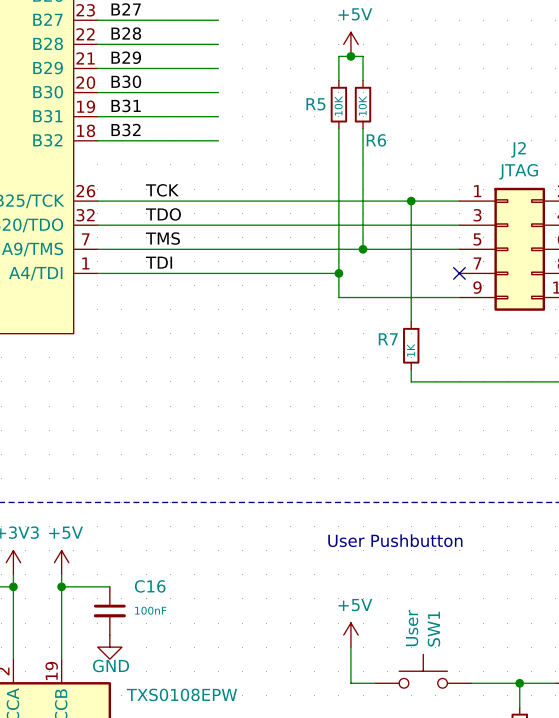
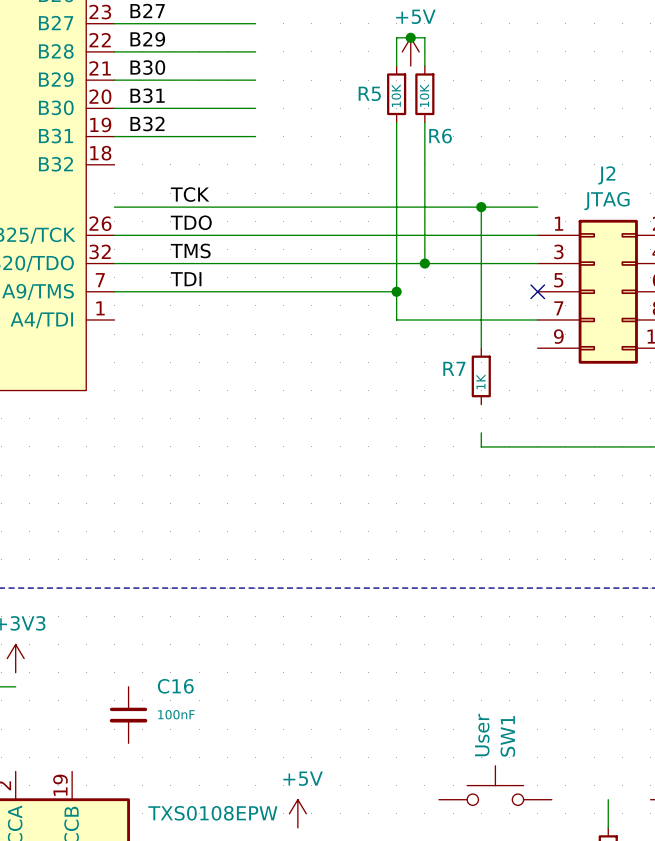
label: B28 (126, 33) -> B29 (147, 39)
junction position: (350, 56) -> (410, 37)
label: B29 (126, 57) -> B30 (147, 67)
wire: (338, 80) (338, 56) (363, 56) (363, 80) -> (396, 66) (396, 37) (424, 37) (424, 66)
label: B30 (126, 81) -> B31 (147, 95)
wire: none -> (396, 122) (396, 150)
R5 position: (338, 104) -> (396, 94)
R6 position: (363, 104) -> (424, 94)
label: B31 (126, 105) -> B32 (147, 123)
label: B32 (126, 130) -> none
wire: (97, 140) (218, 140) -> none
label: none -> TCK (190, 194)
wire: none -> (114, 207) (537, 207)
label: TCK (162, 190) -> TDO (191, 222)
junction position: (411, 201) -> (481, 207)
label: TDO (163, 214) -> TMS (190, 250)
wire: (363, 225) (363, 249) -> (424, 122) (424, 150)
junction: none -> (424, 263)
label: TMS (162, 238) -> TDI (186, 279)
wire: (338, 249) (459, 249) -> (396, 319) (537, 319)
junction: none -> (396, 291)
junction: (363, 249) -> none
label: TDI (159, 262) -> none
wire: (97, 273) (338, 273) (338, 297) (459, 297) -> none
junction: (338, 273) -> none
no-connect mark position: (459, 273) -> (537, 291)
wire: (411, 297) (411, 321) -> (481, 207) (481, 235)
R7 position: (411, 345) -> (481, 376)
text: User Pushbutton (395, 540) -> none
power symbol: +5V (61, 562) -> none
wire: (13, 574) (13, 659) -> none
wire: (61, 574) (61, 659) -> none
junction: (13, 586) -> none
wire: (61, 586) (109, 586) -> none
junction: (61, 586) -> none
power symbol position: +5V (350, 635) -> +5V (297, 813)
power symbol: GND (109, 647) -> none
wire: (350, 647) (350, 683) (375, 683) -> none
wire: (471, 683) (555, 683) -> none
junction: (519, 683) -> none

